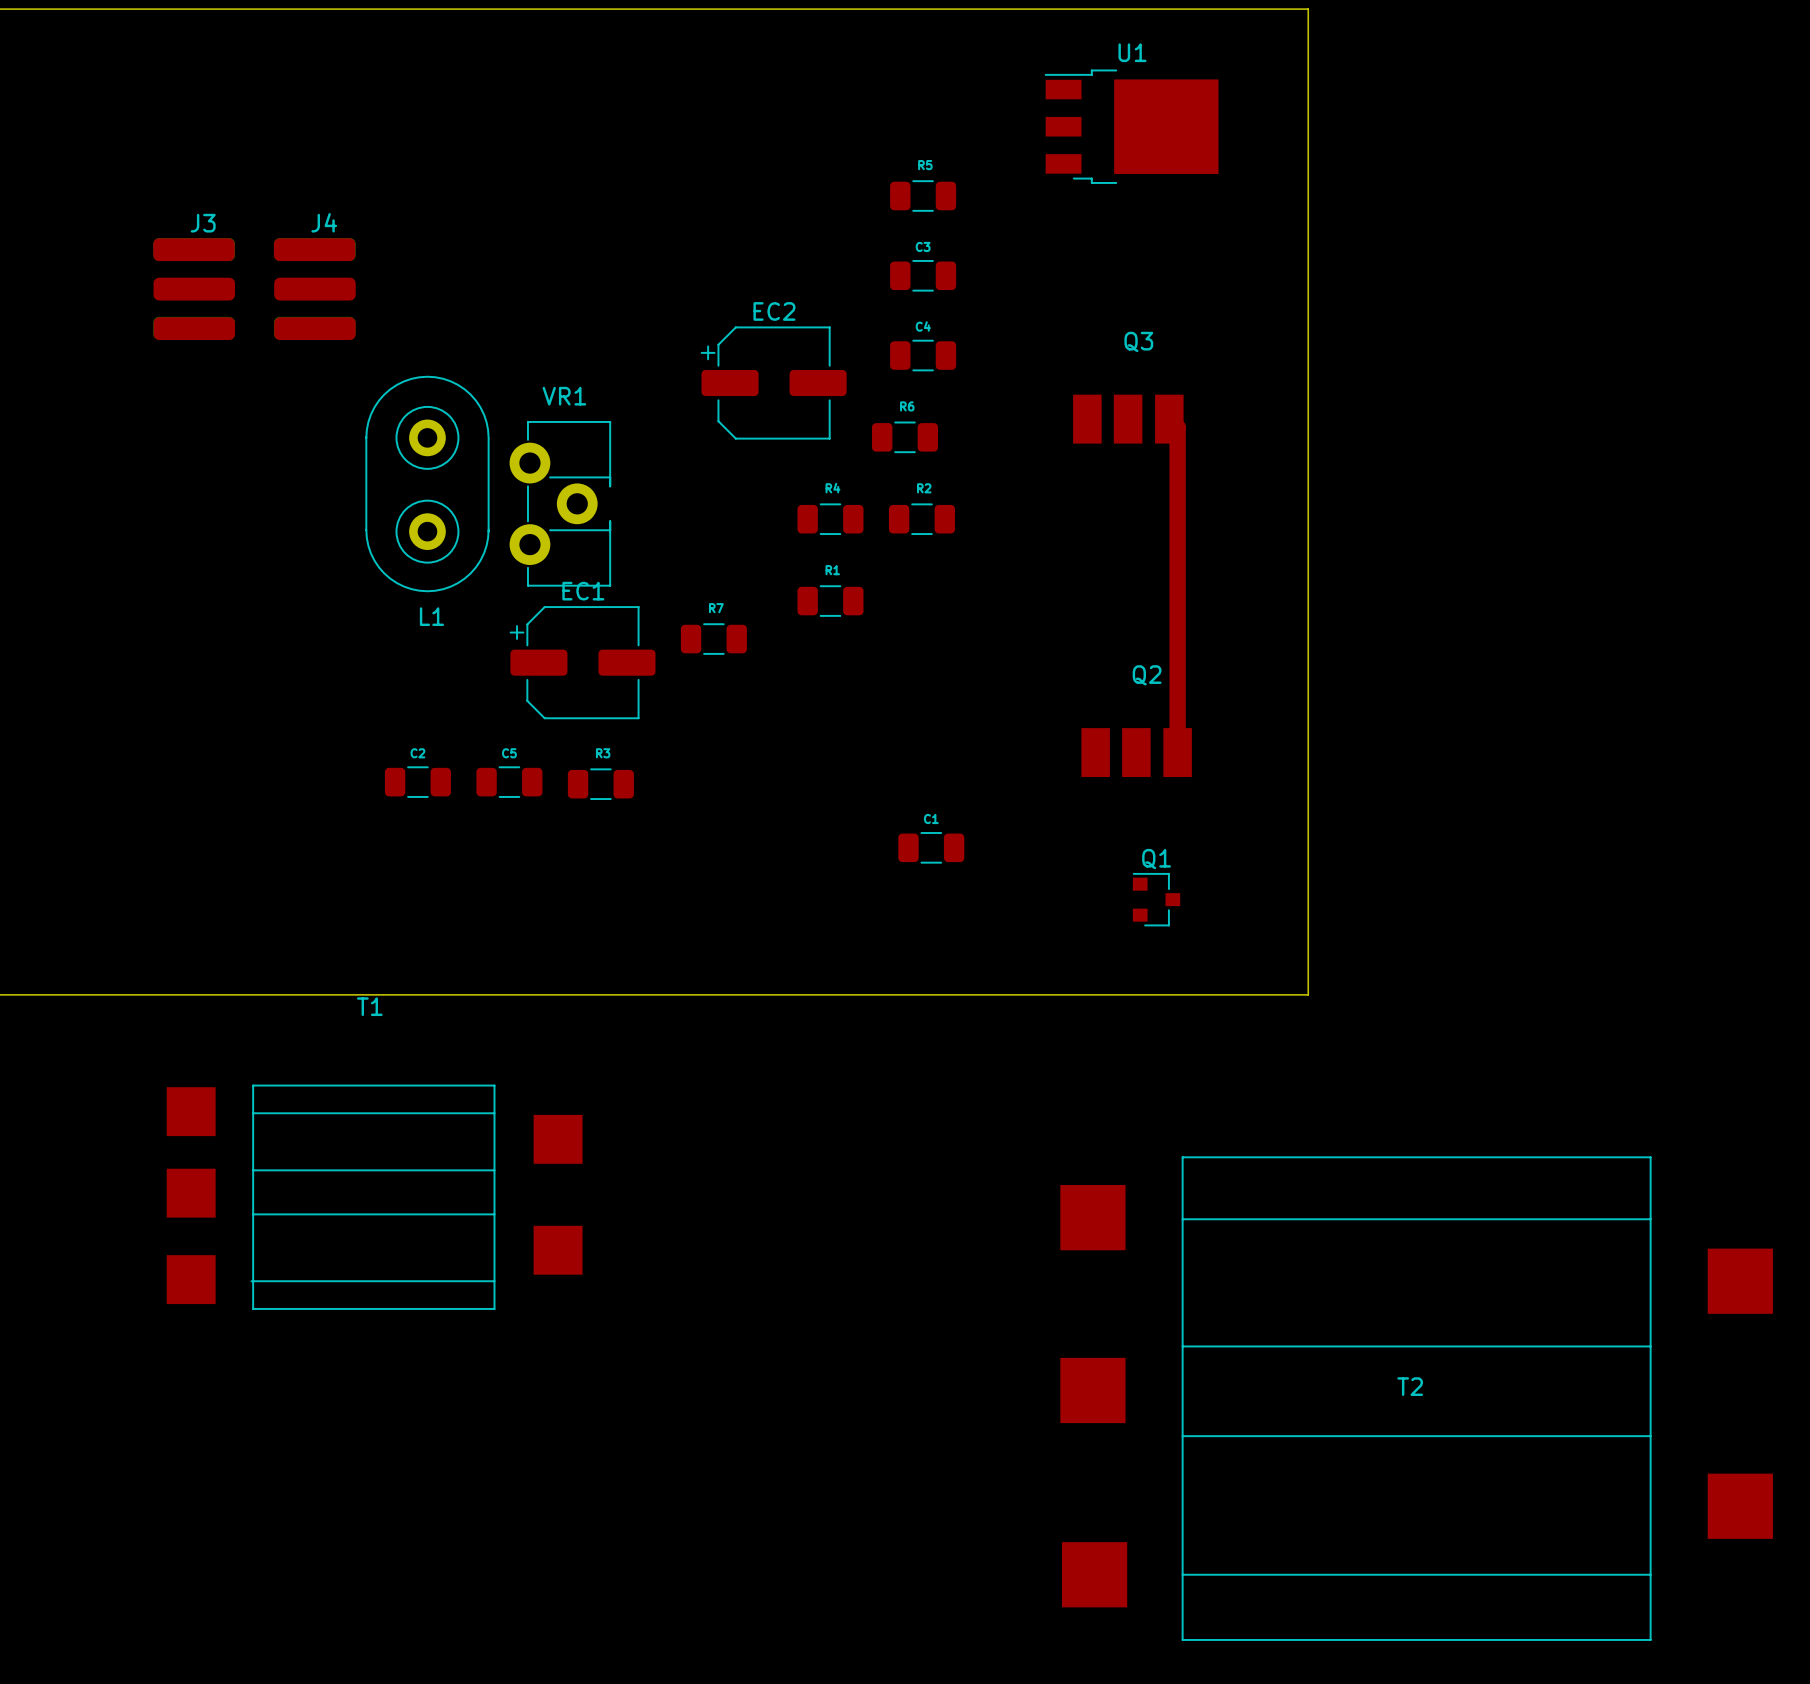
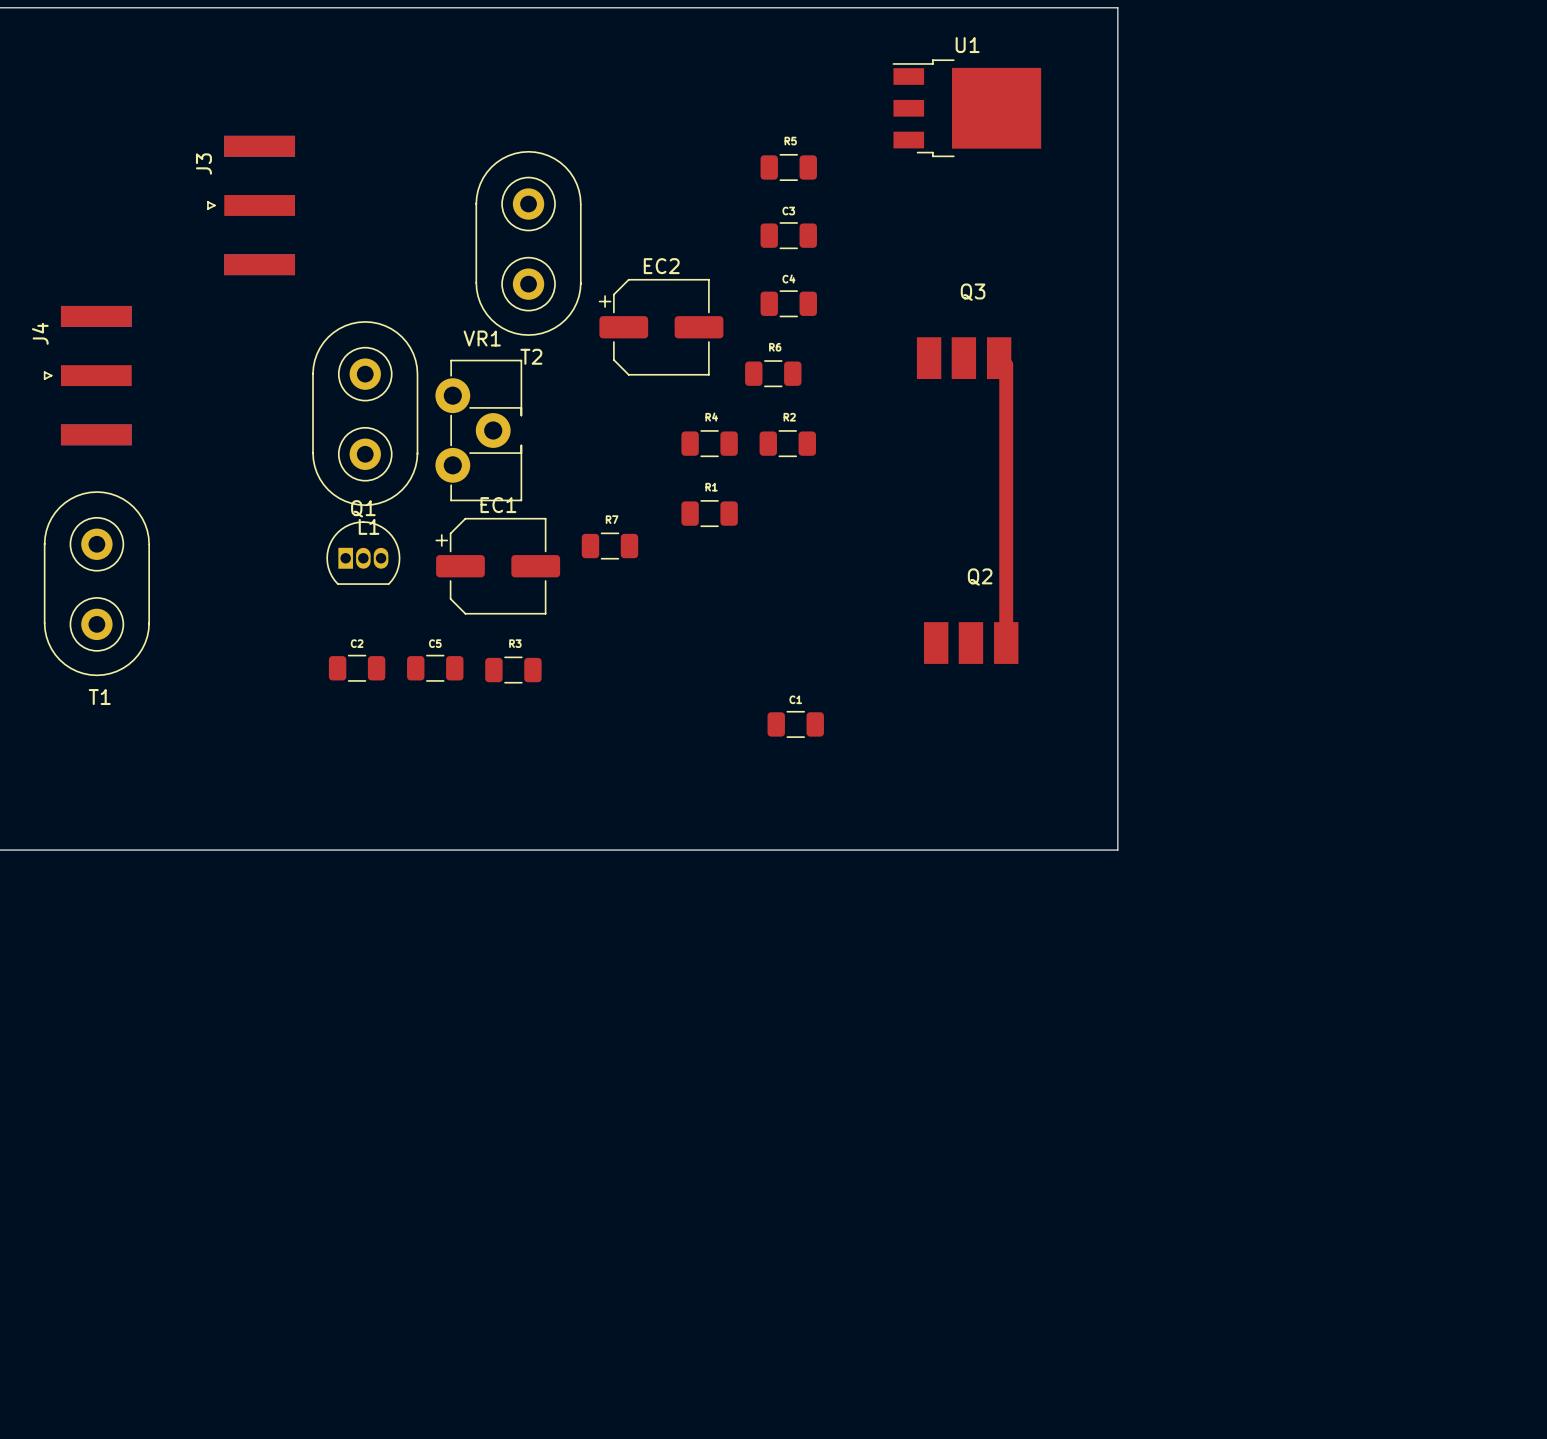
J4 name position: J4 (324, 222) -> J4 (40, 333)
J3 name position: J3 (203, 223) -> J3 (203, 164)
J3 footprint: [153, 238, 236, 341] -> [207, 135, 296, 276]
J4 footprint: [273, 238, 356, 341] -> [43, 305, 132, 446]
Q1 footprint: [1132, 872, 1181, 927] -> [326, 521, 401, 585]
T1 name position: T1 (369, 1006) -> T1 (99, 697)
T1 footprint: [166, 1084, 583, 1310] -> [43, 491, 150, 677]
T2 footprint: [1060, 1156, 1773, 1641] -> [475, 150, 582, 336]
T2 name position: T2 (1410, 1386) -> T2 (531, 356)

